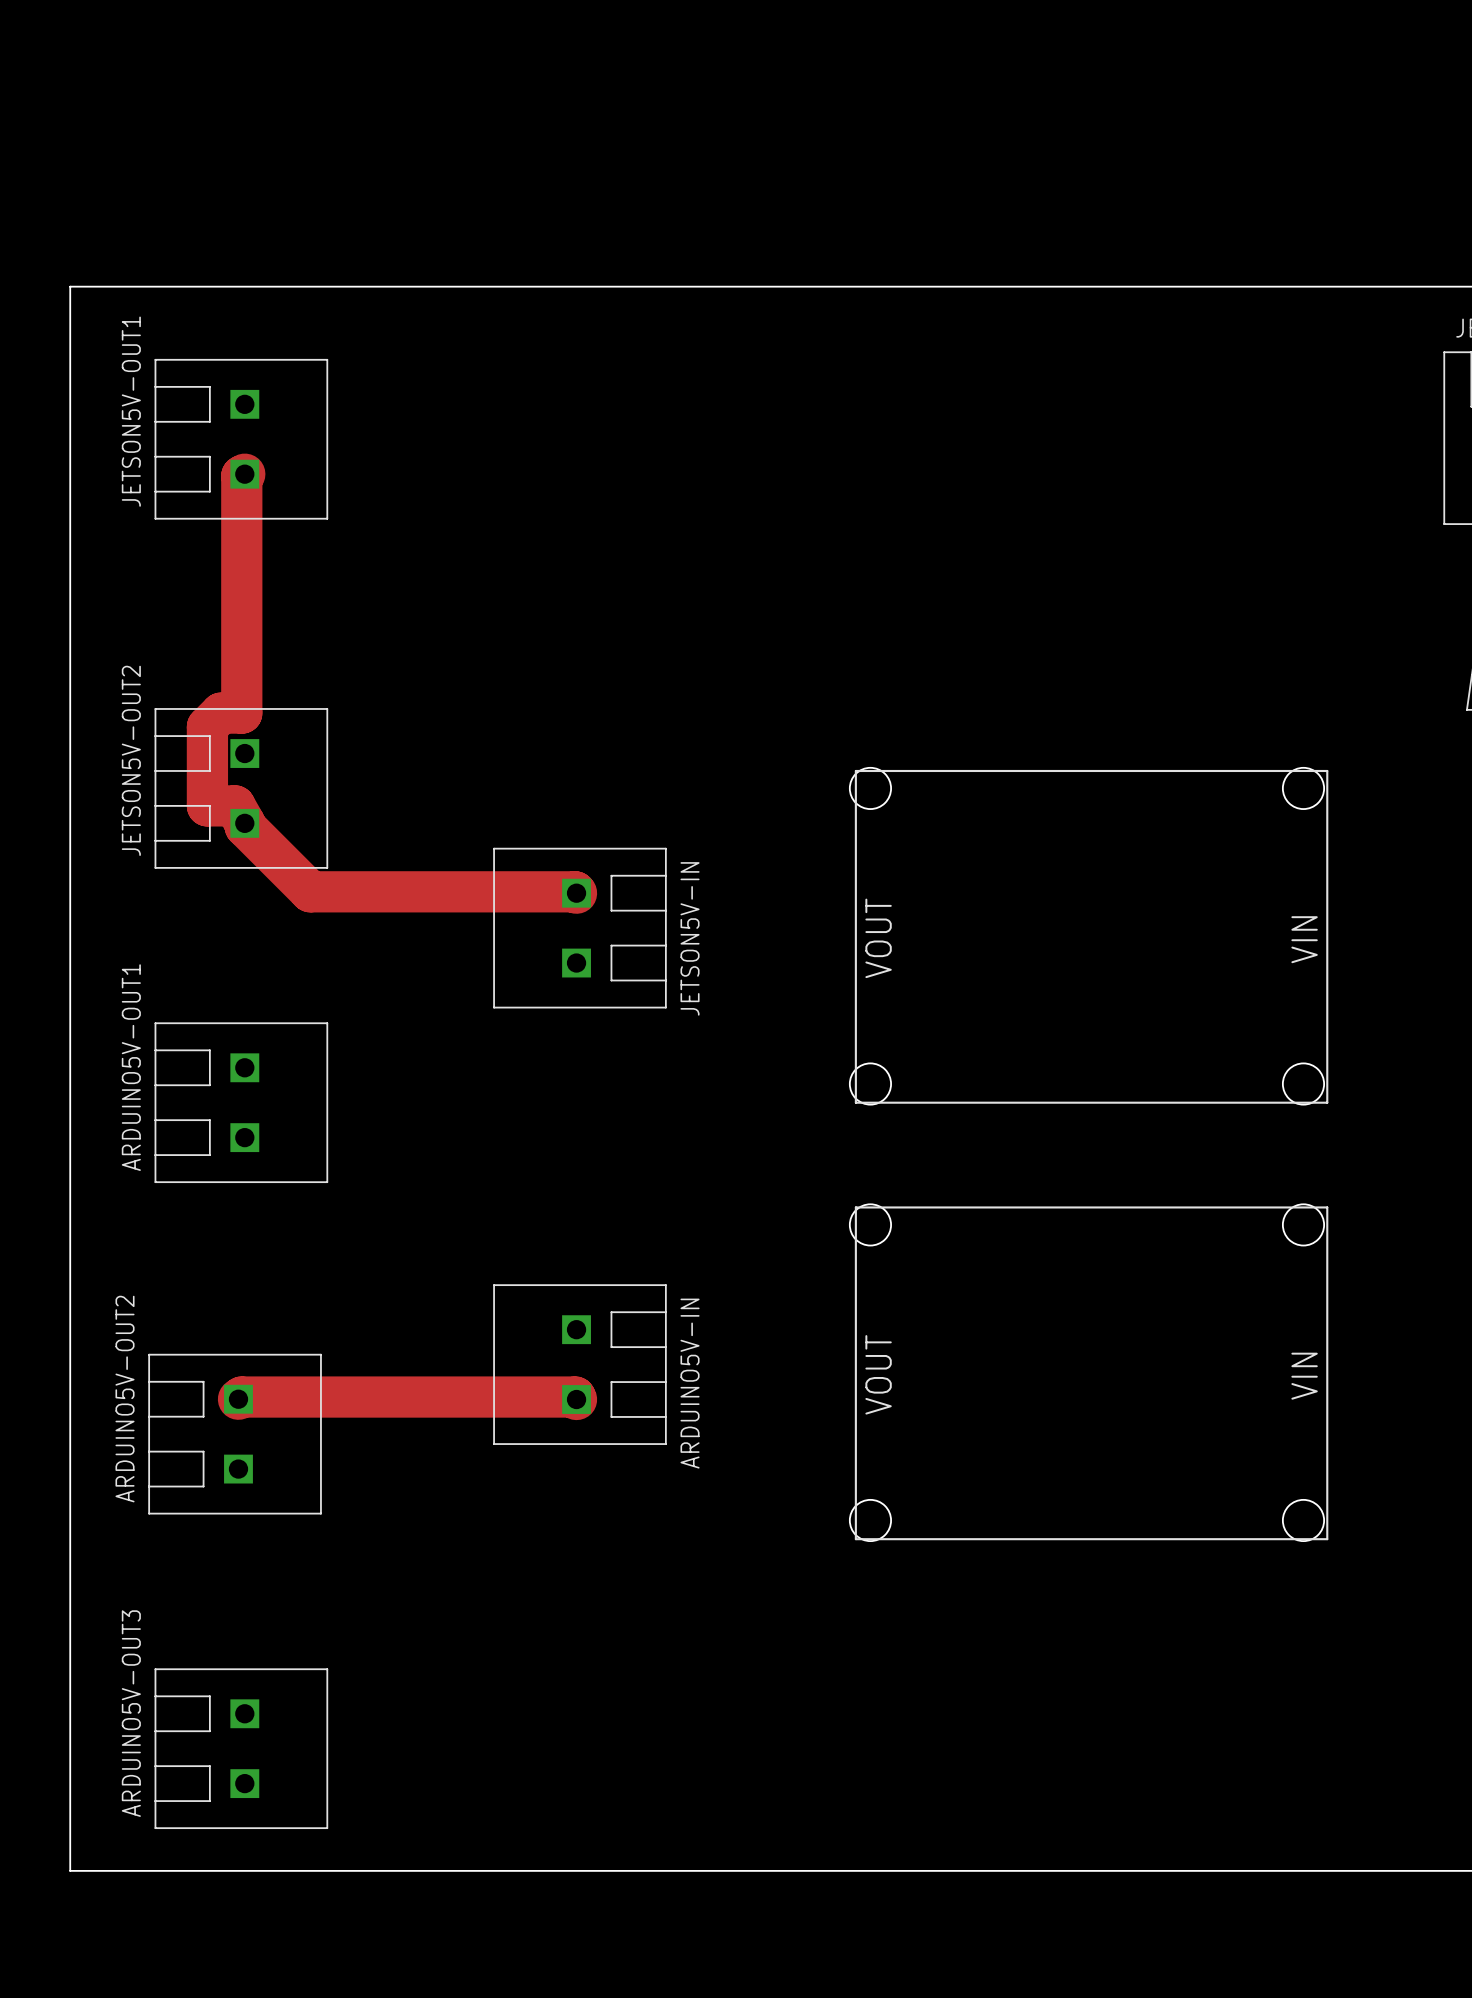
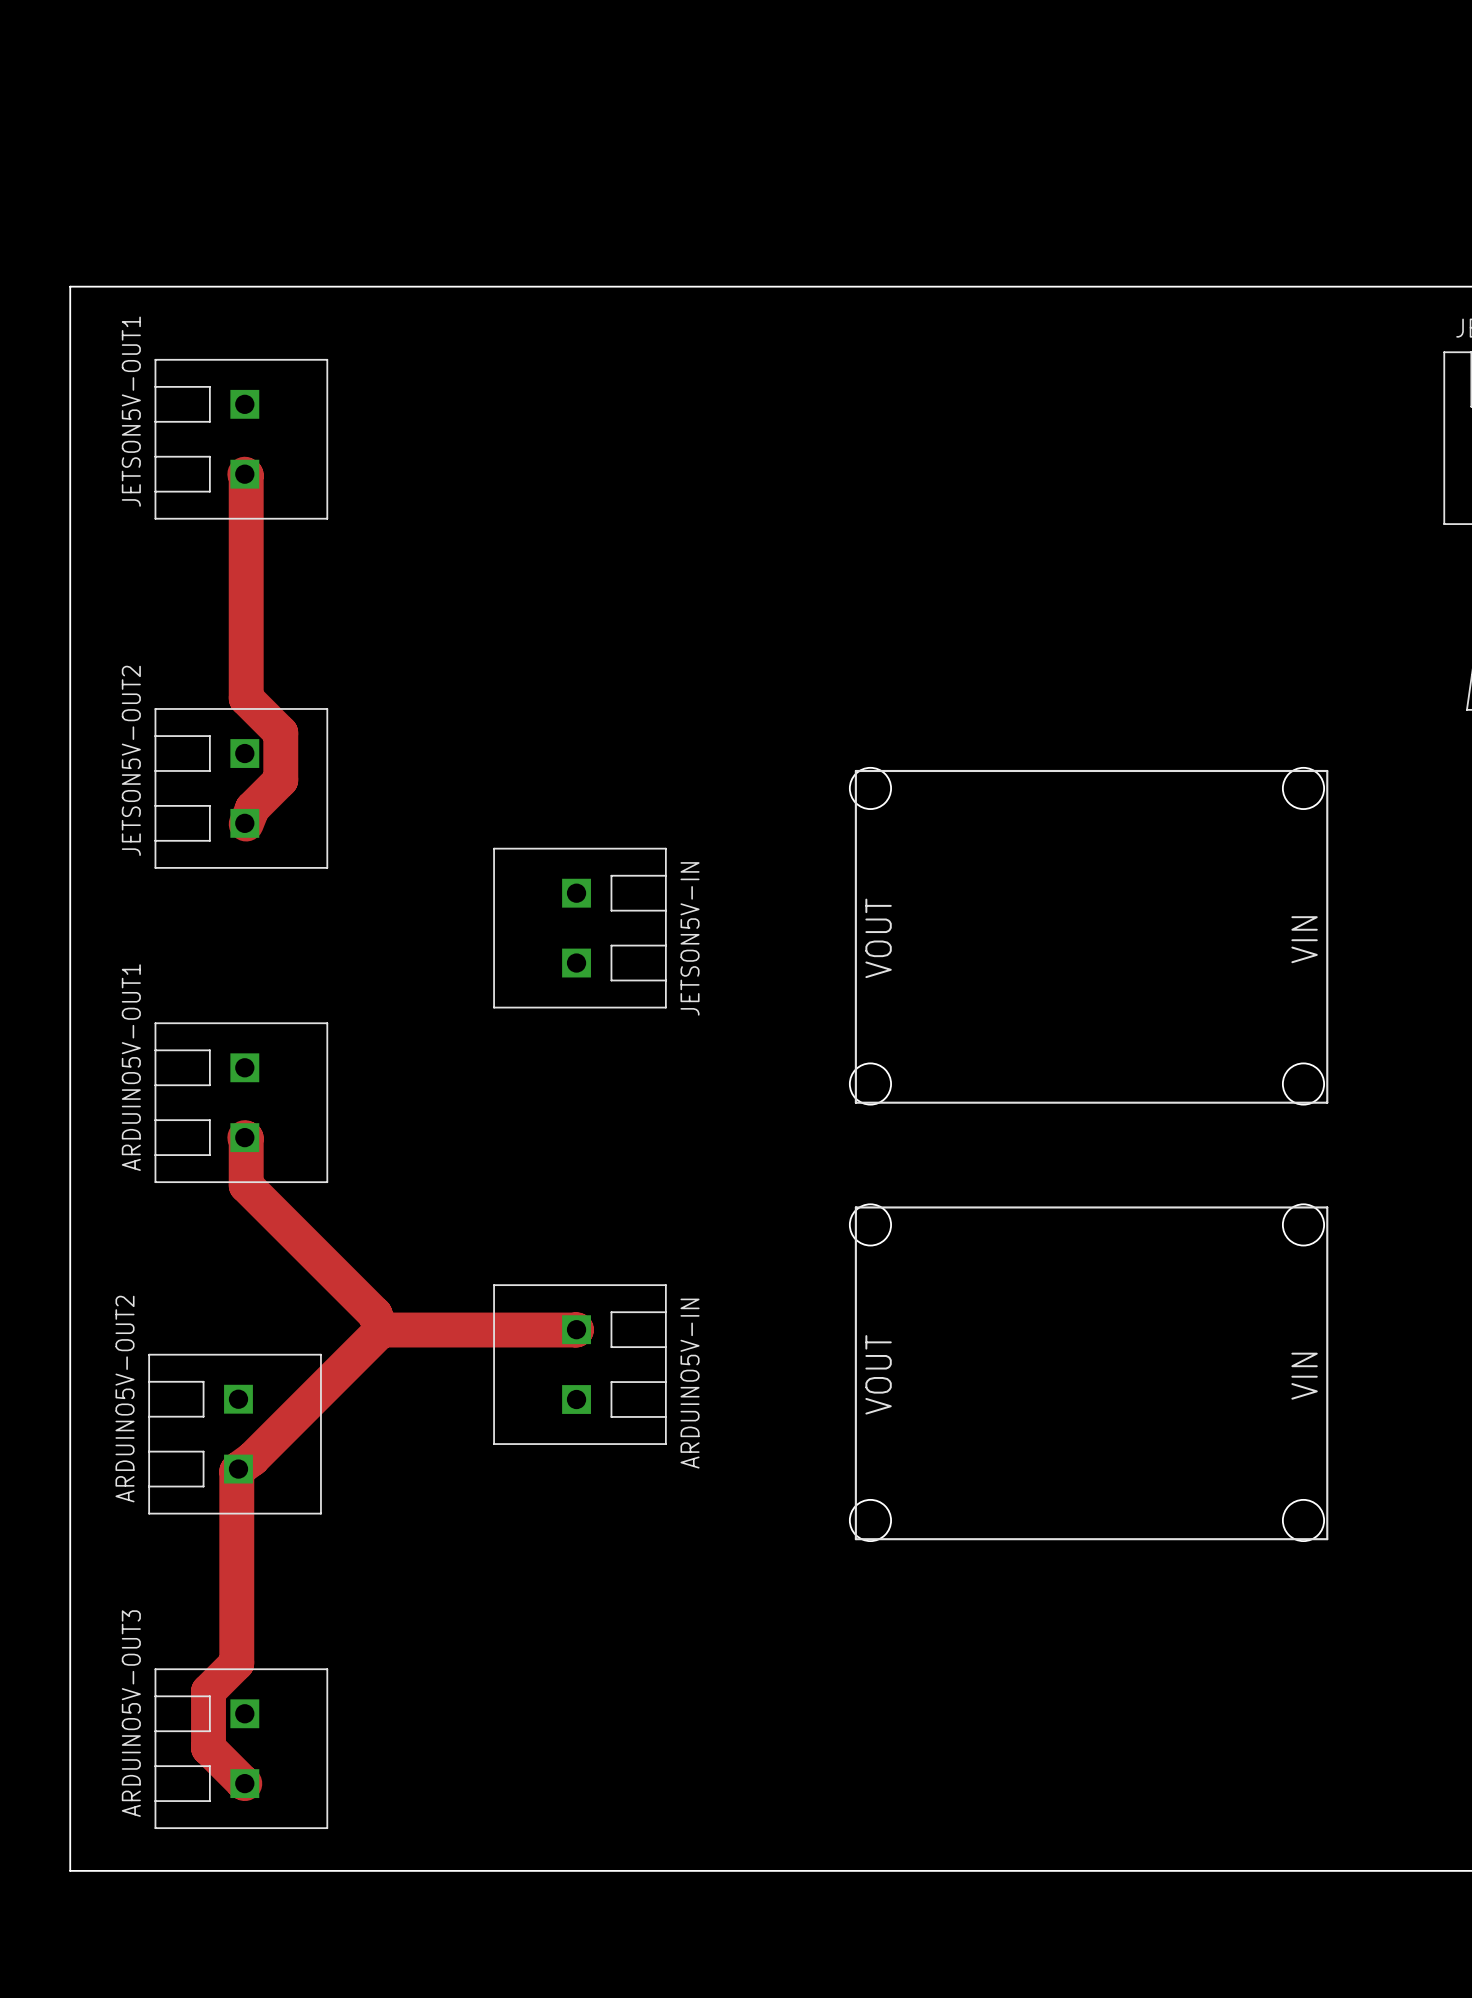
track: (244, 474) (241, 475) (241, 713) (221, 713) (207, 726) (207, 805) (234, 805) (245, 826) (310, 891) (576, 893) -> (244, 474) (246, 698) (280, 732) (280, 780) (252, 808) (246, 824)
track: none -> (244, 1137) (246, 1185) (375, 1314) (381, 1330)
track: none -> (576, 1329) (381, 1330)
track: none -> (381, 1330) (252, 1458) (236, 1471) (236, 1663) (208, 1691) (208, 1747) (244, 1783)
track: (238, 1399) (241, 1397) (575, 1397) (576, 1399) -> none

